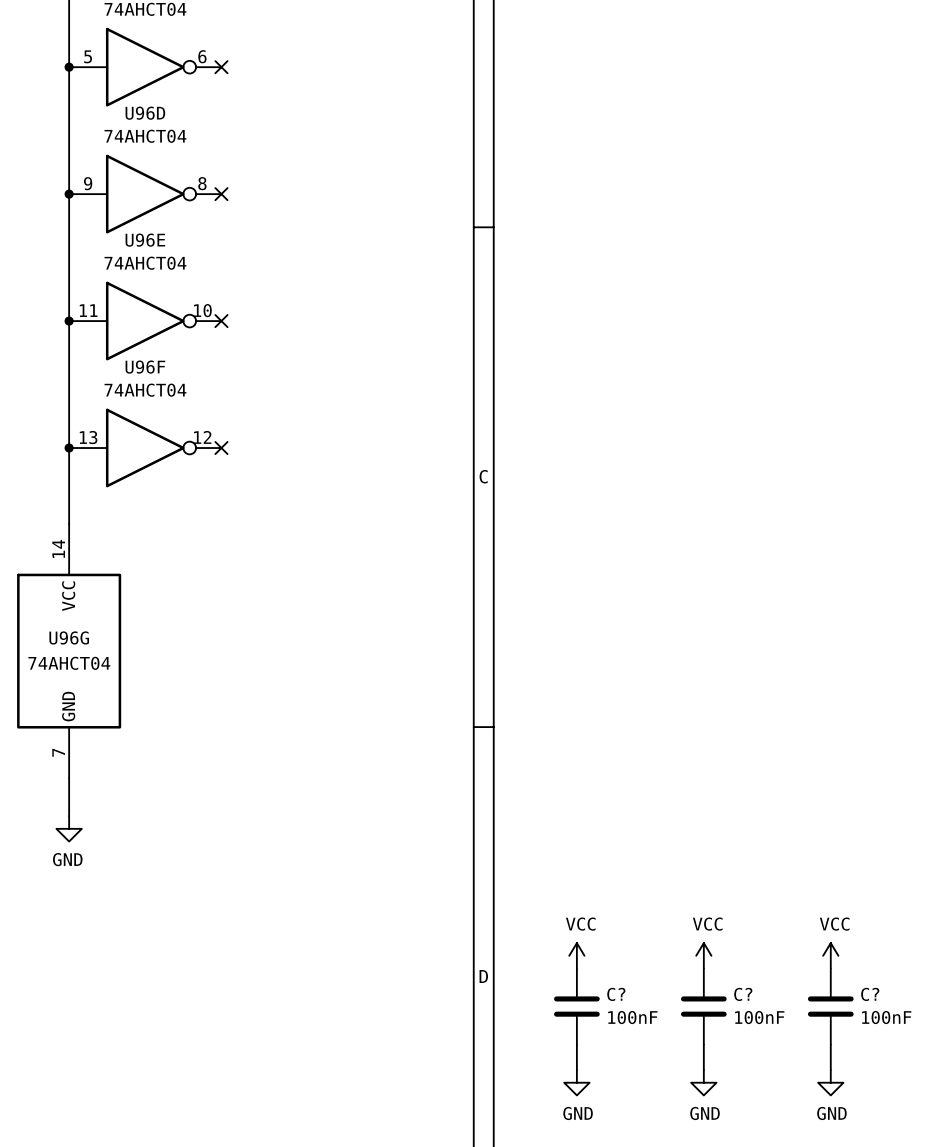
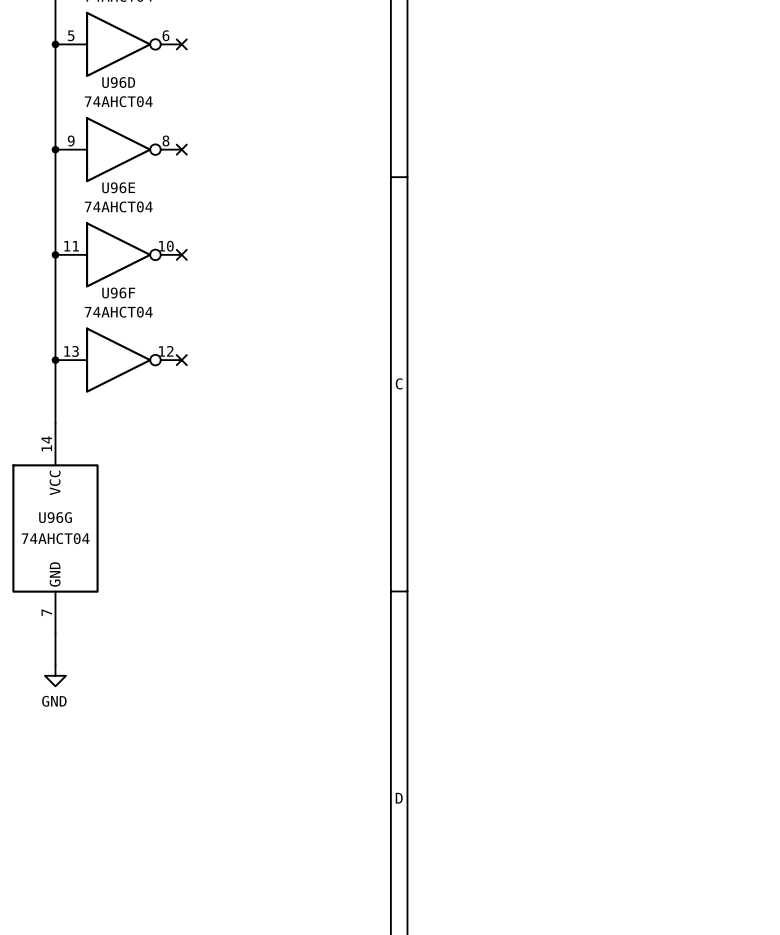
power symbol: VCC (576, 955) -> none
power symbol: VCC (703, 955) -> none
power symbol: VCC (830, 955) -> none
C?: 100nF (576, 1006) -> none
C?: 100nF (703, 1006) -> none
C?: 100nF (830, 1006) -> none
wire: (576, 1044) (576, 1070) -> none
wire: (703, 1044) (703, 1070) -> none
wire: (830, 1044) (830, 1070) -> none
power symbol: GND (576, 1082) -> none
power symbol: GND (703, 1082) -> none
power symbol: GND (830, 1082) -> none

